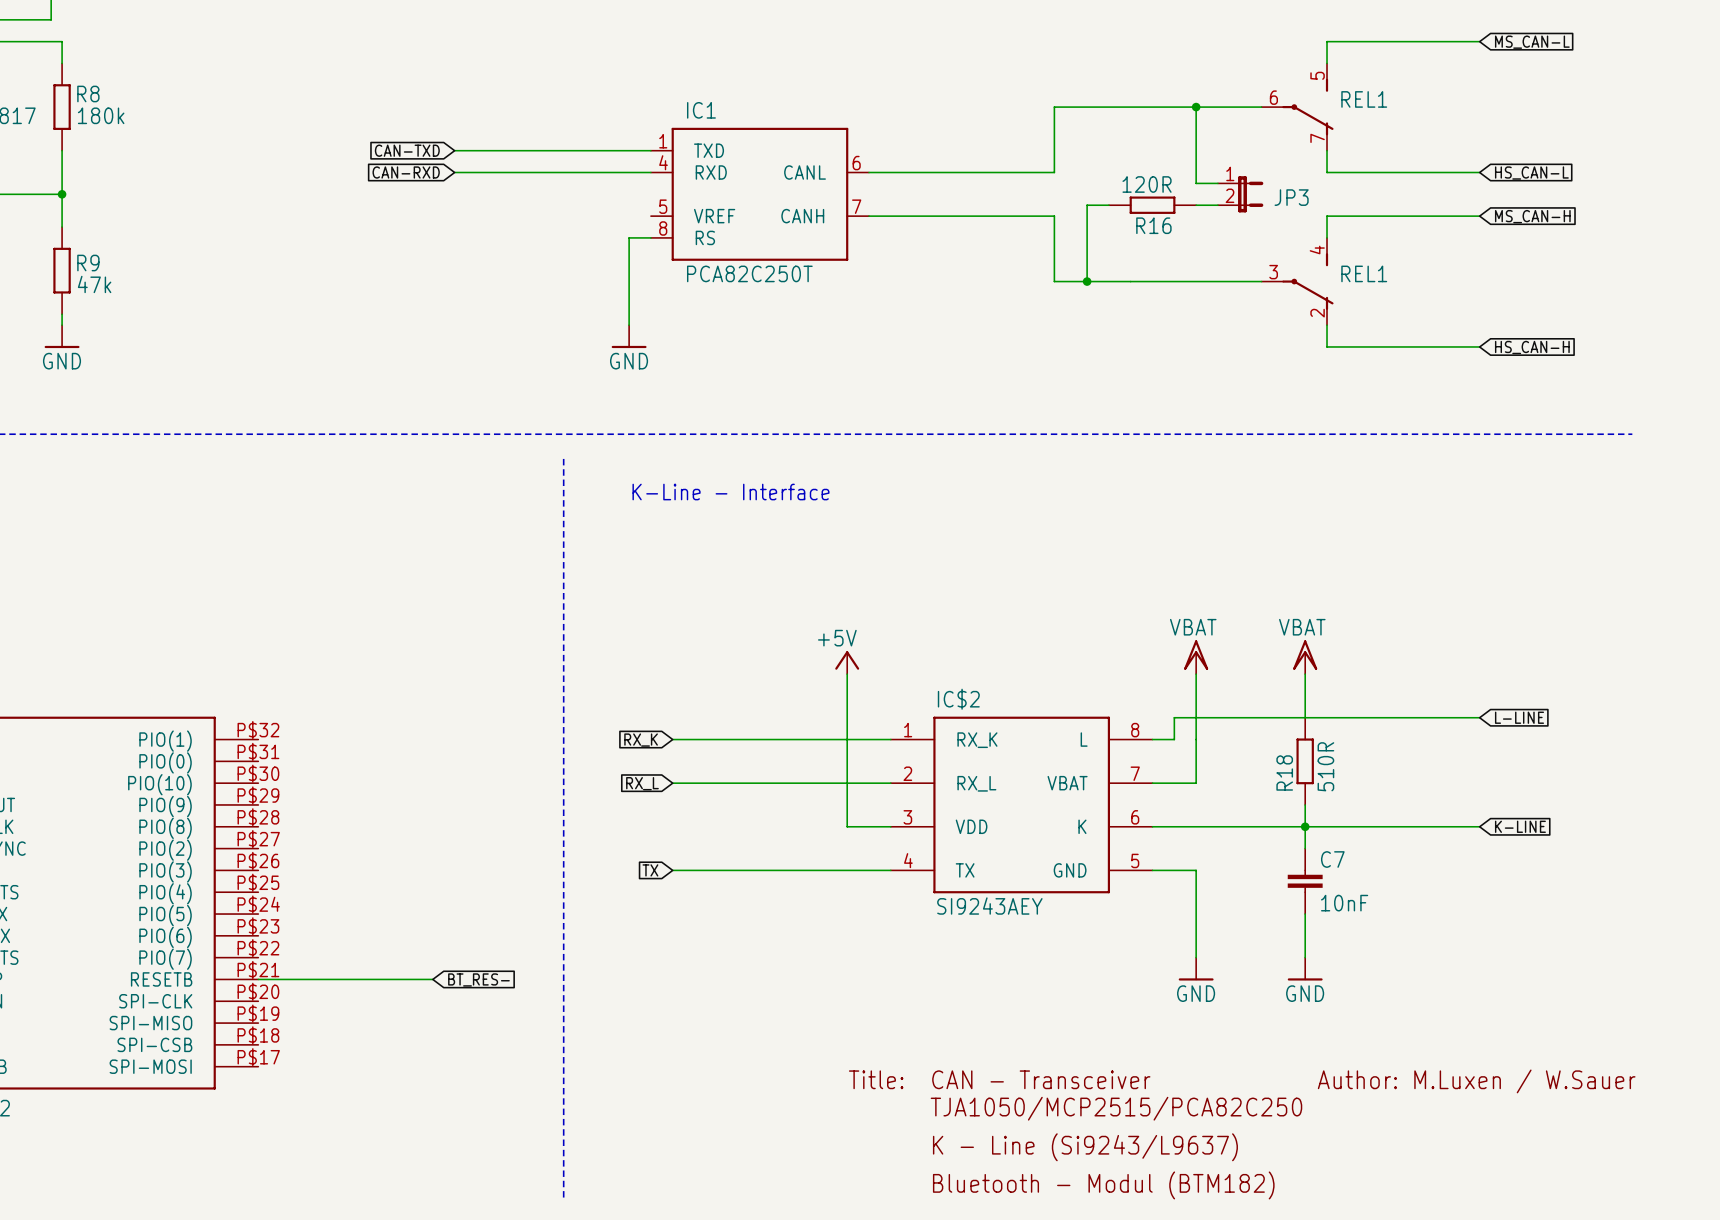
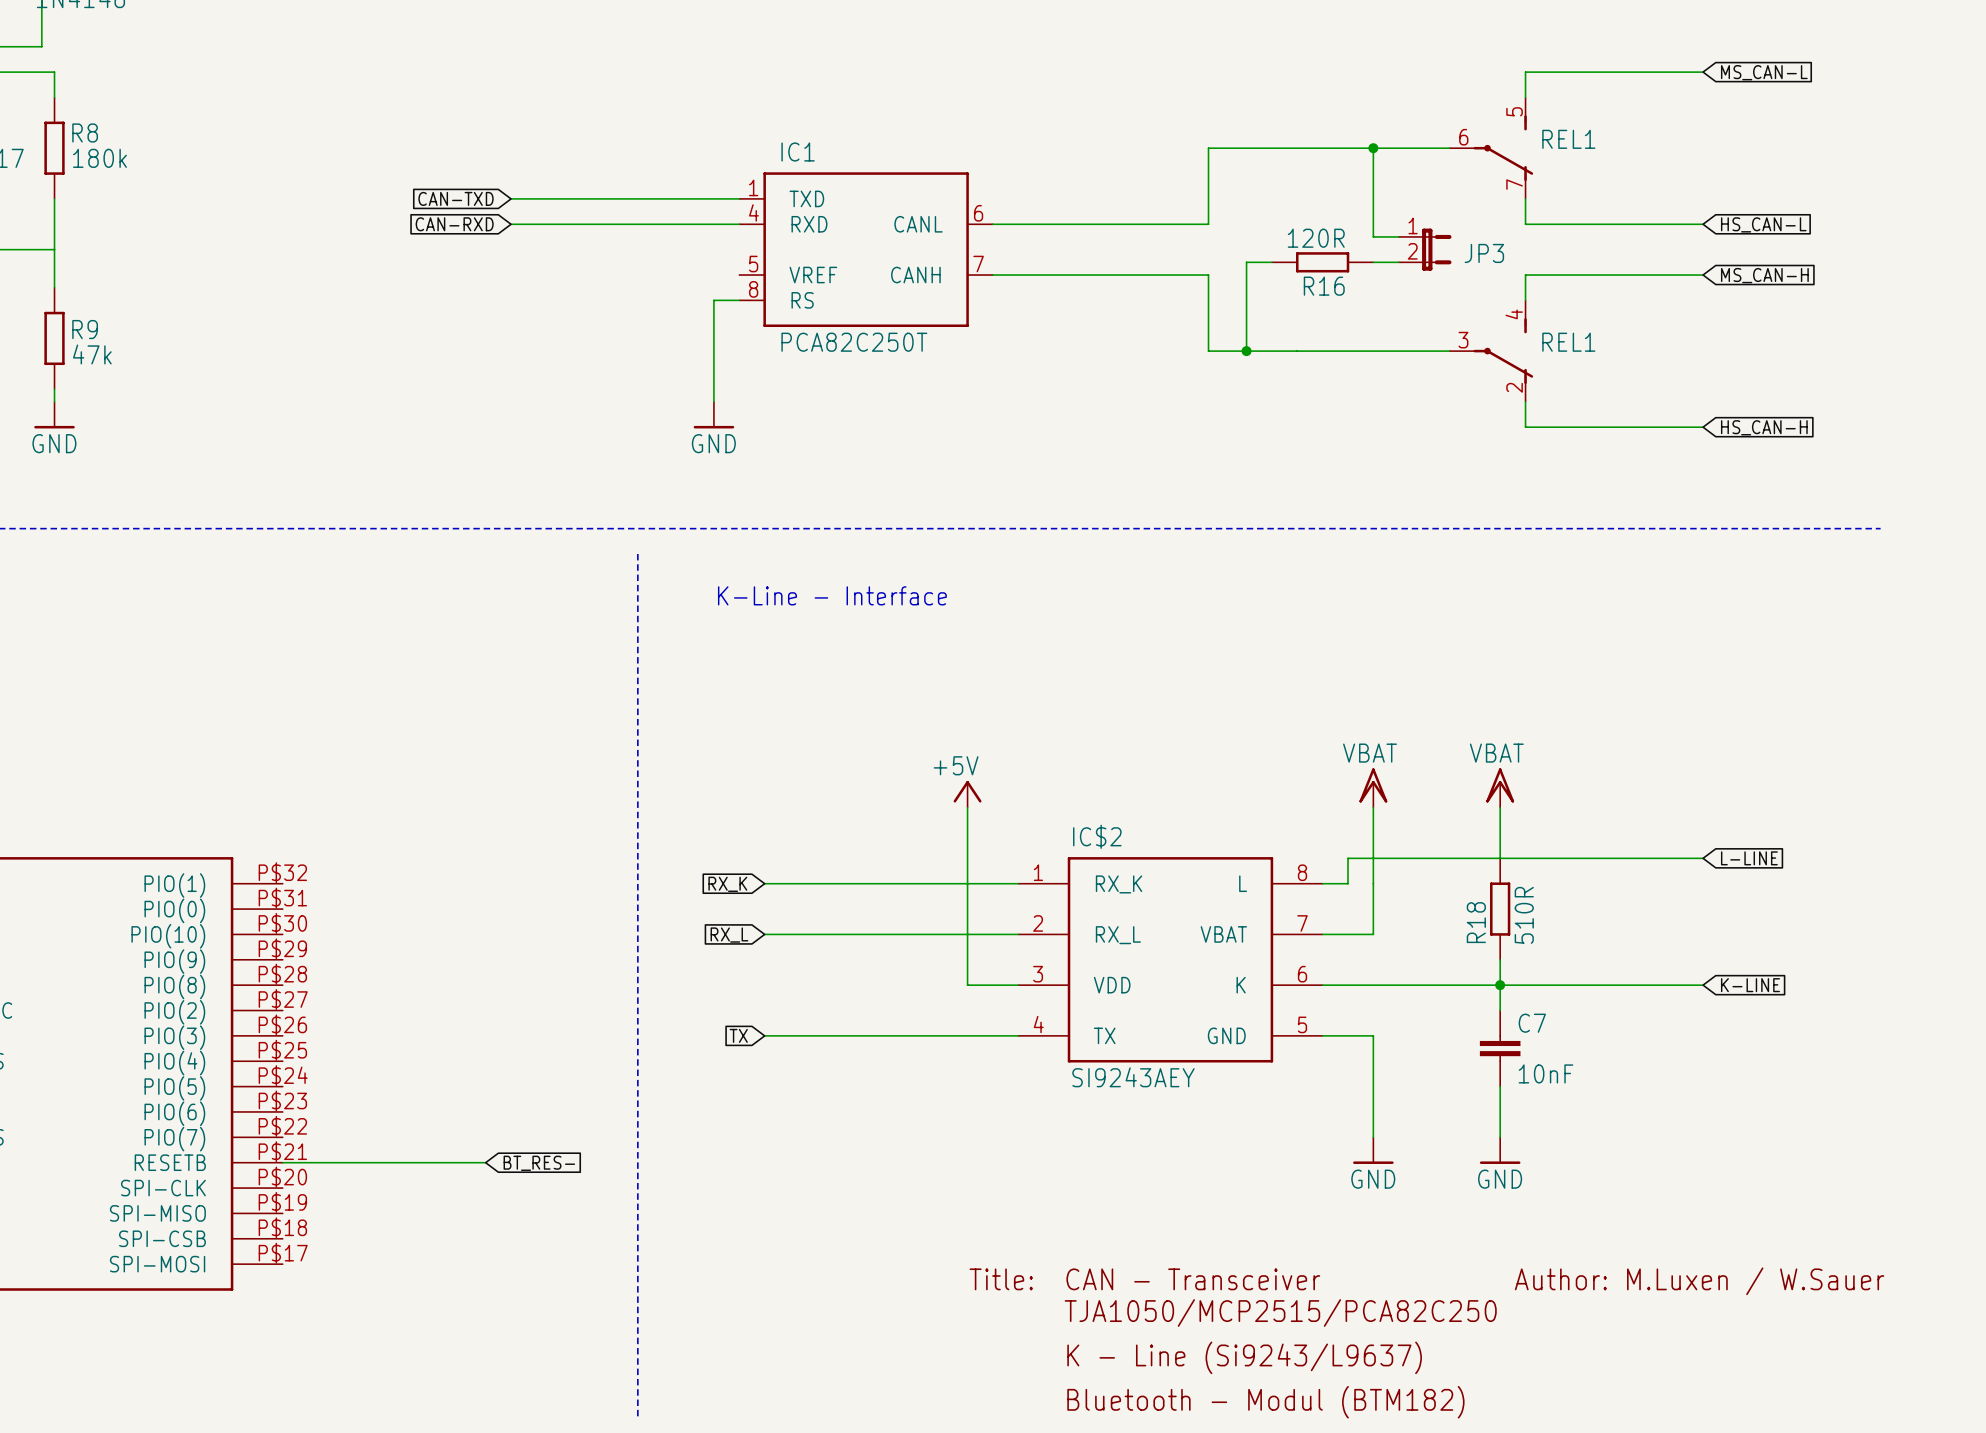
junction: (62, 194) -> none

